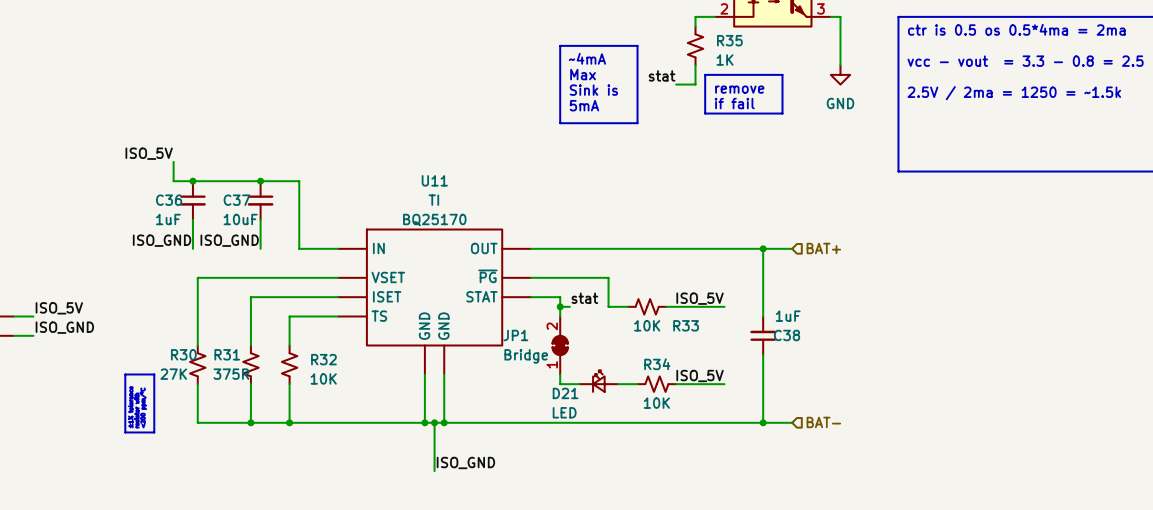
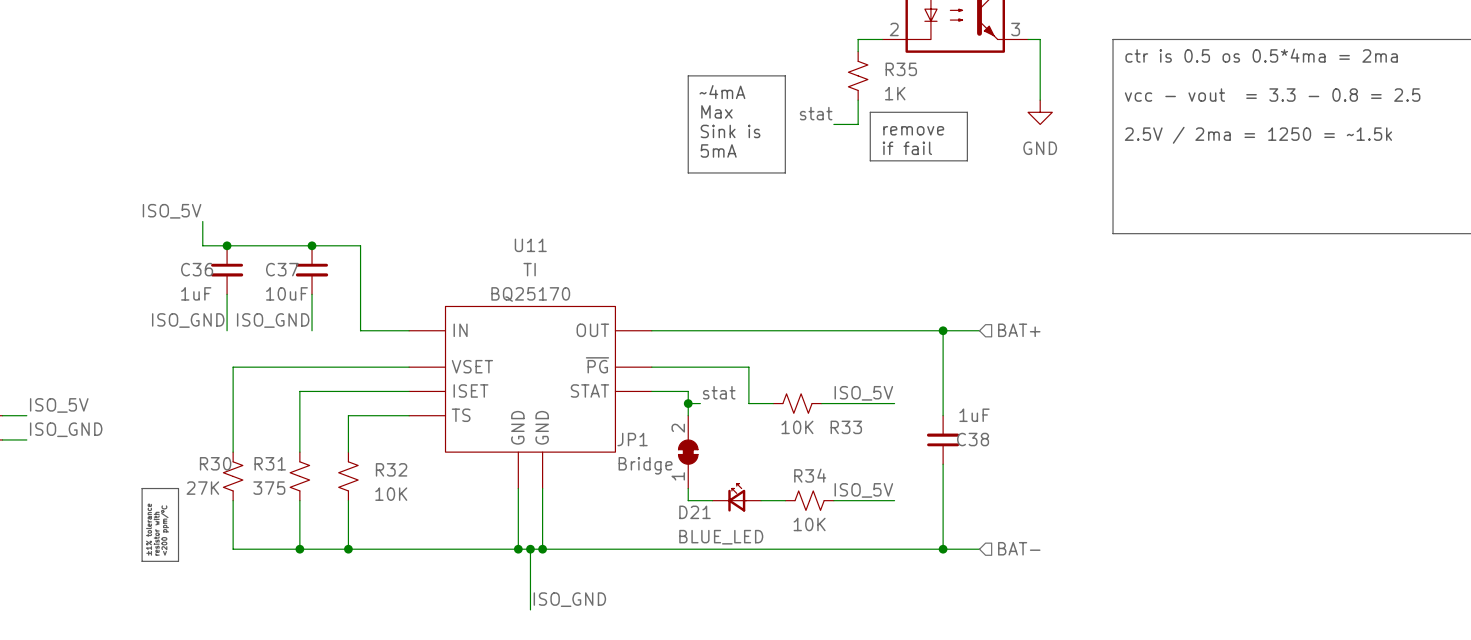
R31 value: 375R (231, 374) -> 375 (269, 488)
D21 value: LED (564, 412) -> BLUE_LED (721, 537)

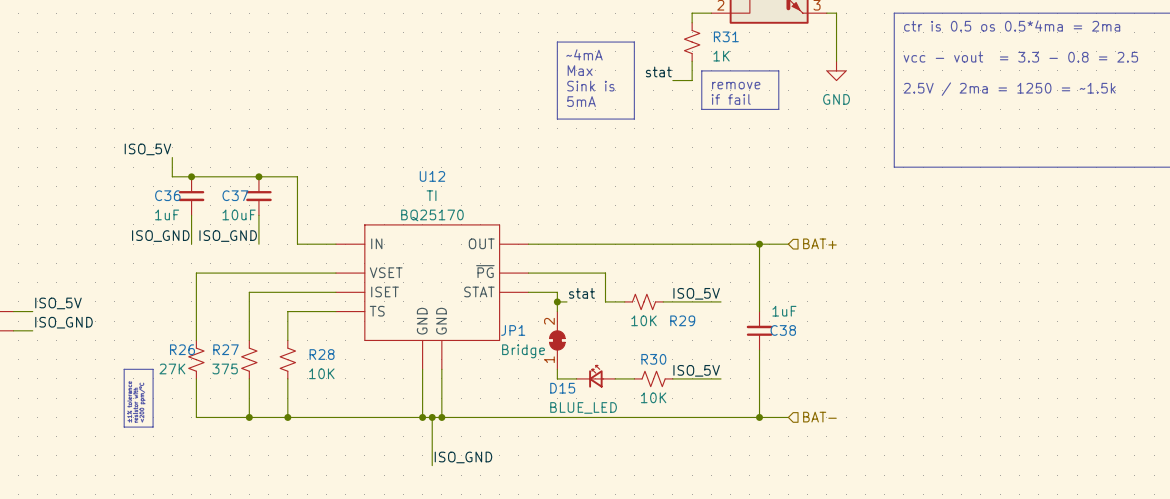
R35 name: R35 (901, 69) -> R31 (726, 36)
U11 name: U11 (530, 245) -> U12 (432, 176)
R33 name: R33 (846, 427) -> R29 (682, 320)
R30 name: R30 (215, 463) -> R26 (182, 349)
R31 name: R31 (270, 463) -> R27 (226, 349)
R32 name: R32 (391, 469) -> R28 (322, 354)
R34 name: R34 (810, 475) -> R30 (653, 359)
D21 name: D21 (694, 512) -> D15 (562, 388)

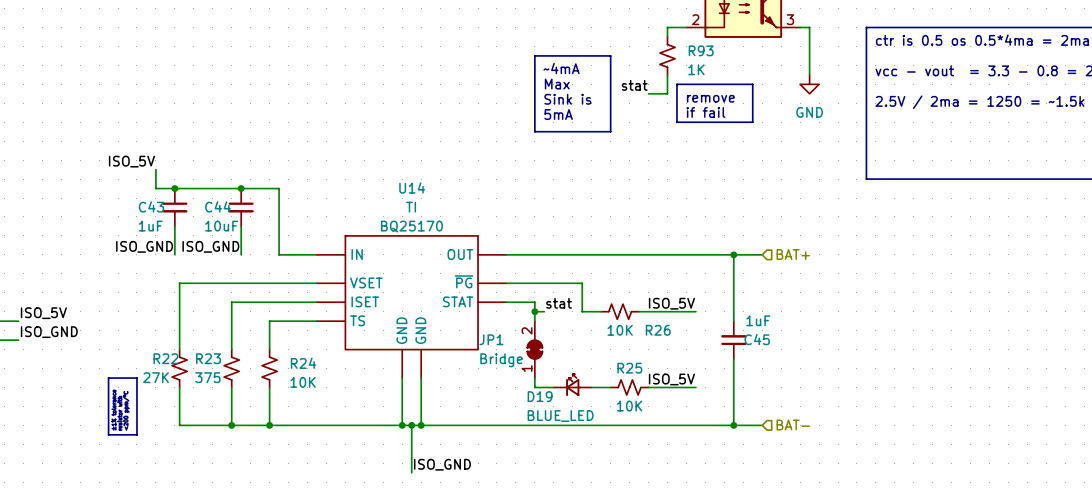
R31 name: R31 (726, 36) -> R93 (701, 50)
U12 name: U12 (432, 176) -> U14 (412, 187)
C36 name: C36 (167, 195) -> C43 (151, 206)
C37 name: C37 (235, 195) -> C44 (218, 206)
R29 name: R29 (682, 320) -> R26 (658, 330)
C38 name: C38 (783, 330) -> C45 (757, 339)
R26 name: R26 (182, 349) -> R22 (165, 358)
R27 name: R27 (226, 349) -> R23 (208, 358)
R28 name: R28 (322, 354) -> R24 (303, 363)
R30 name: R30 (653, 359) -> R25 (629, 368)
D15 name: D15 (562, 388) -> D19 (540, 396)

